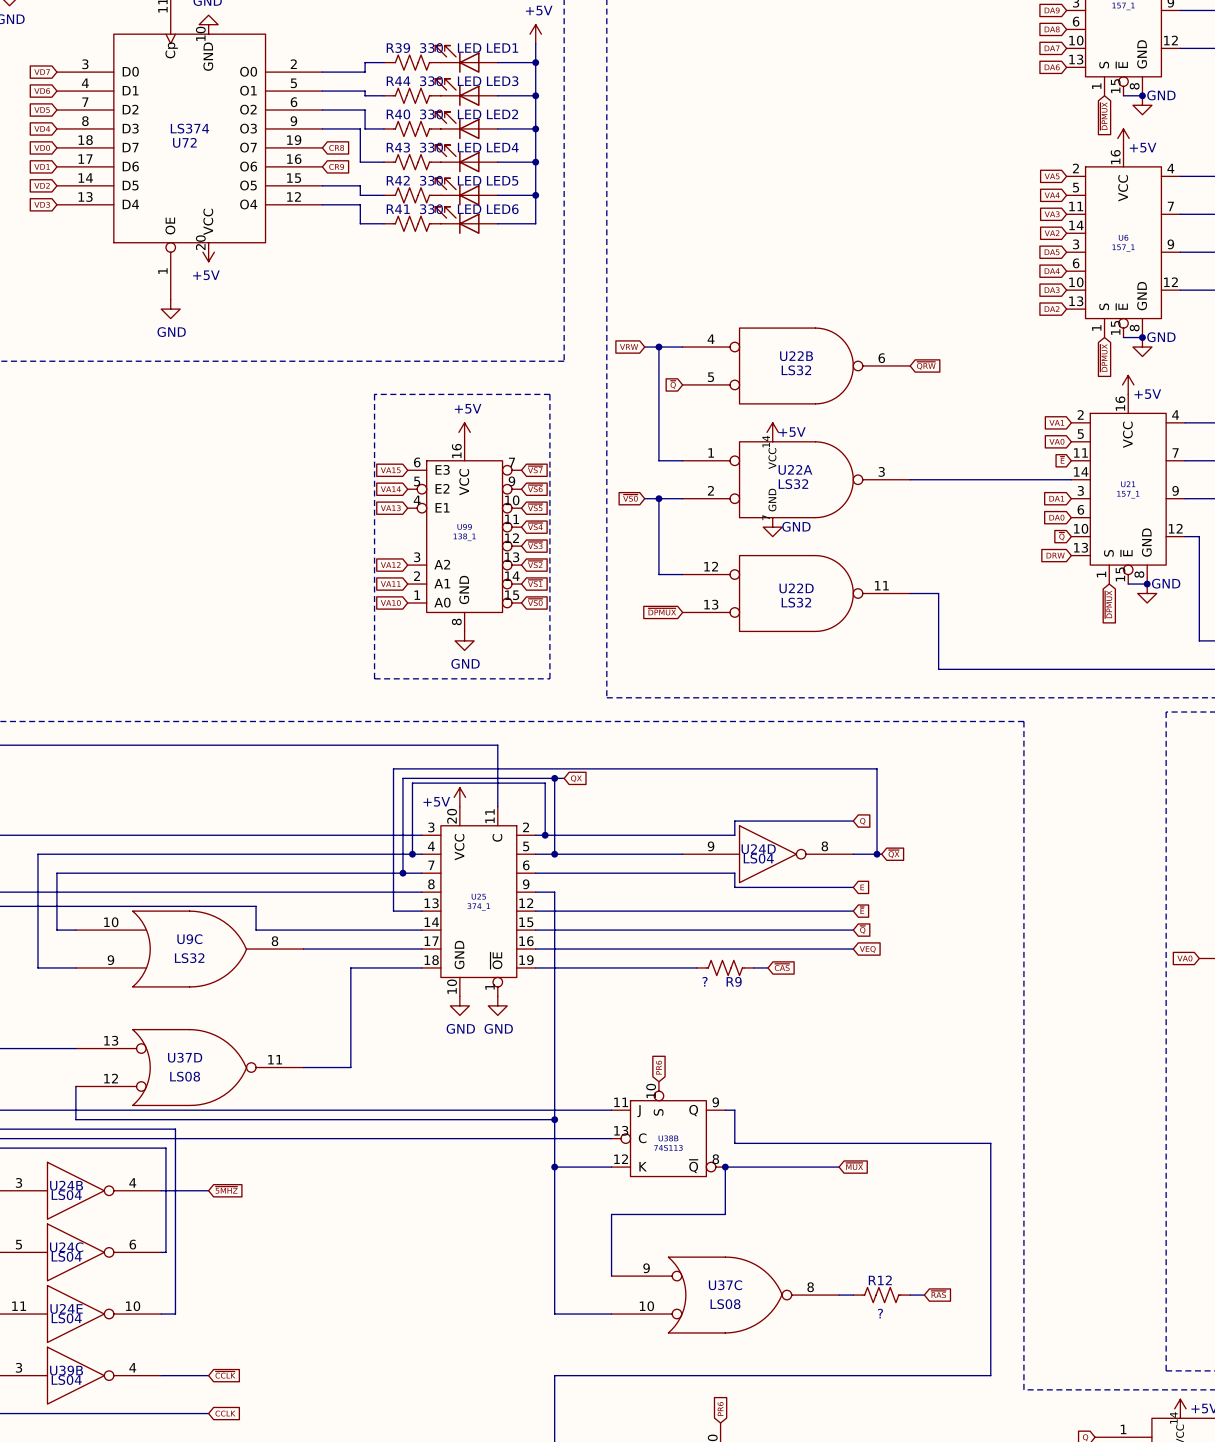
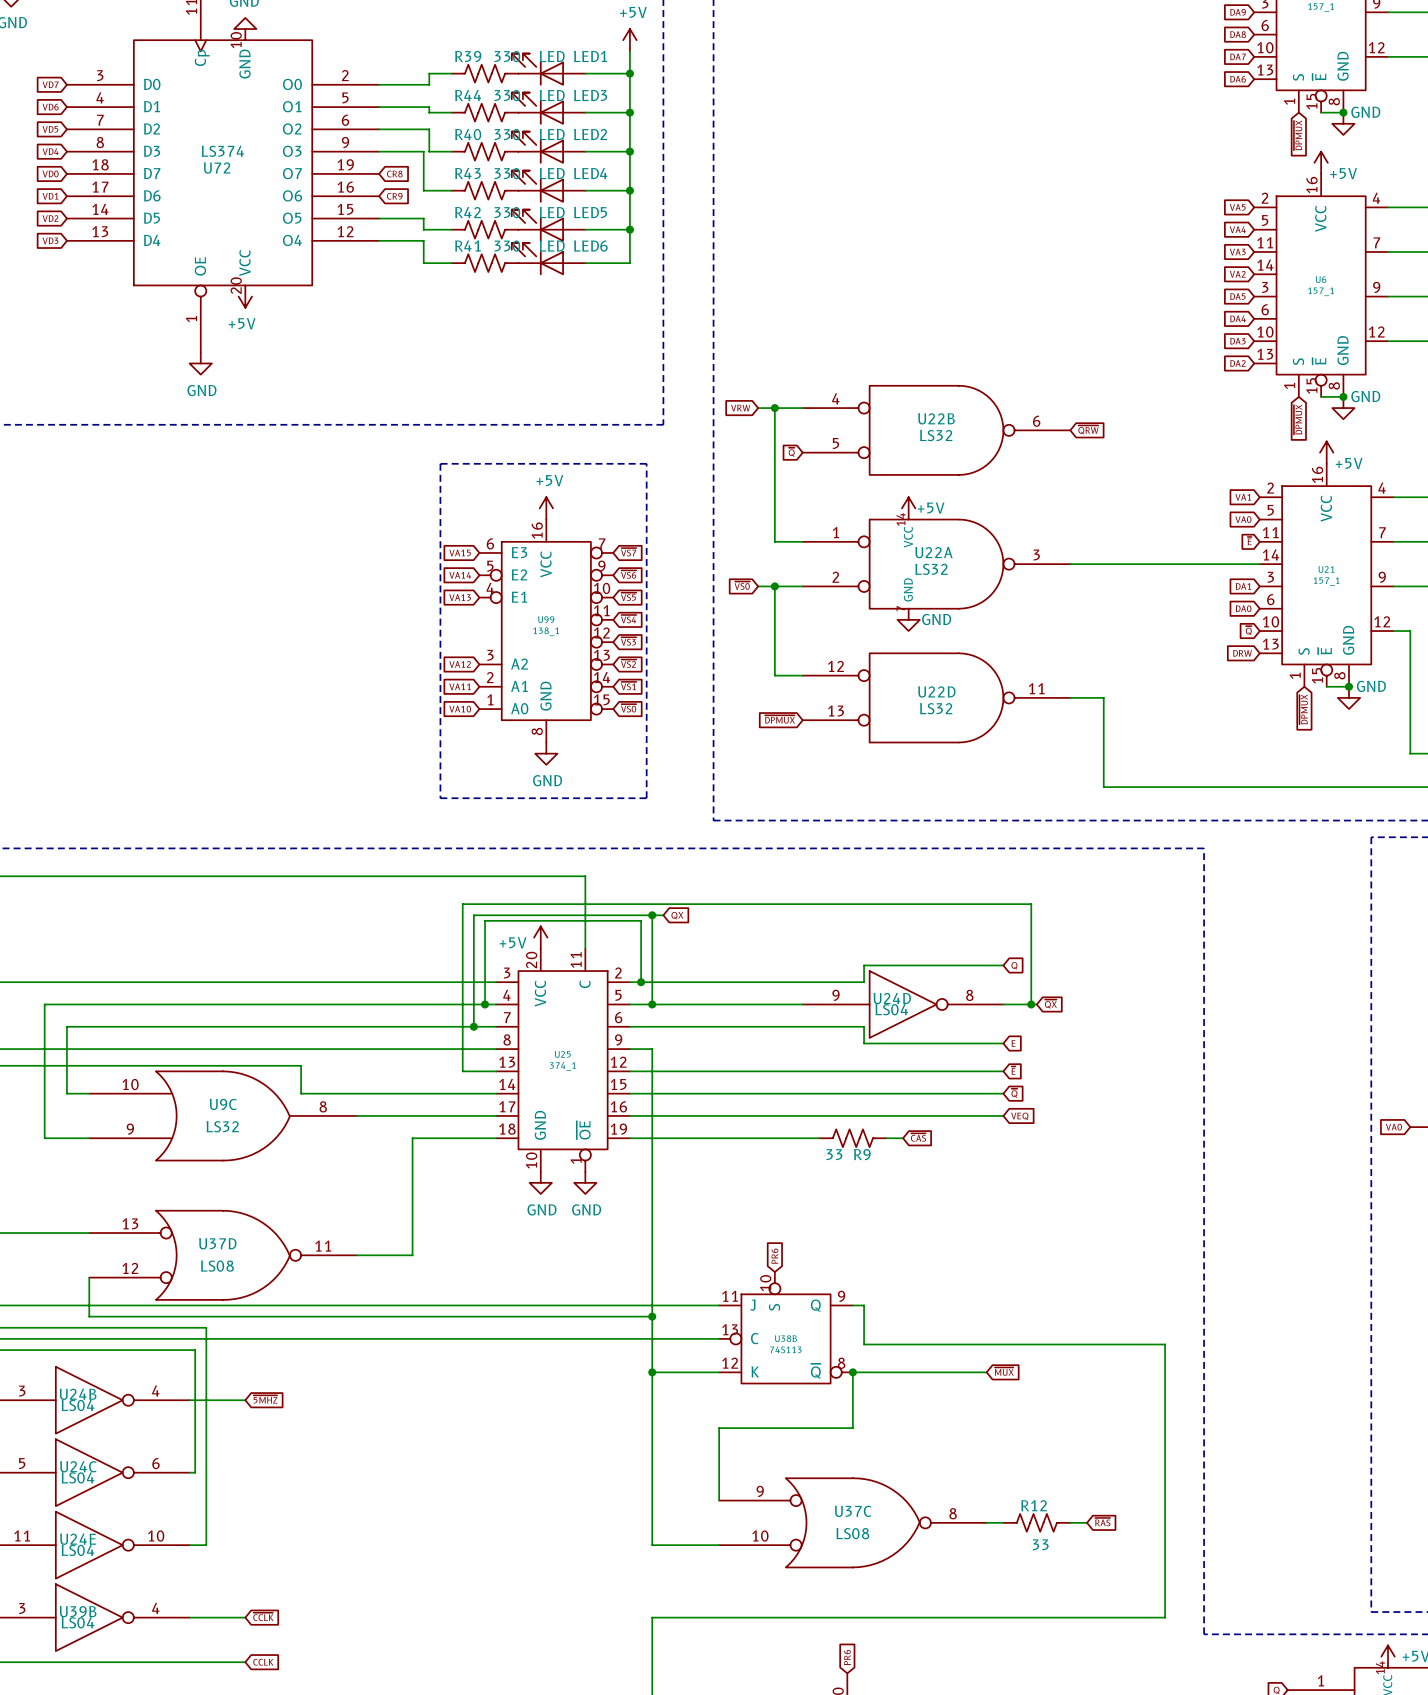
R9 value: ? (705, 981) -> 33 (834, 1154)
R12 value: ? (880, 1313) -> 33 (1040, 1544)

